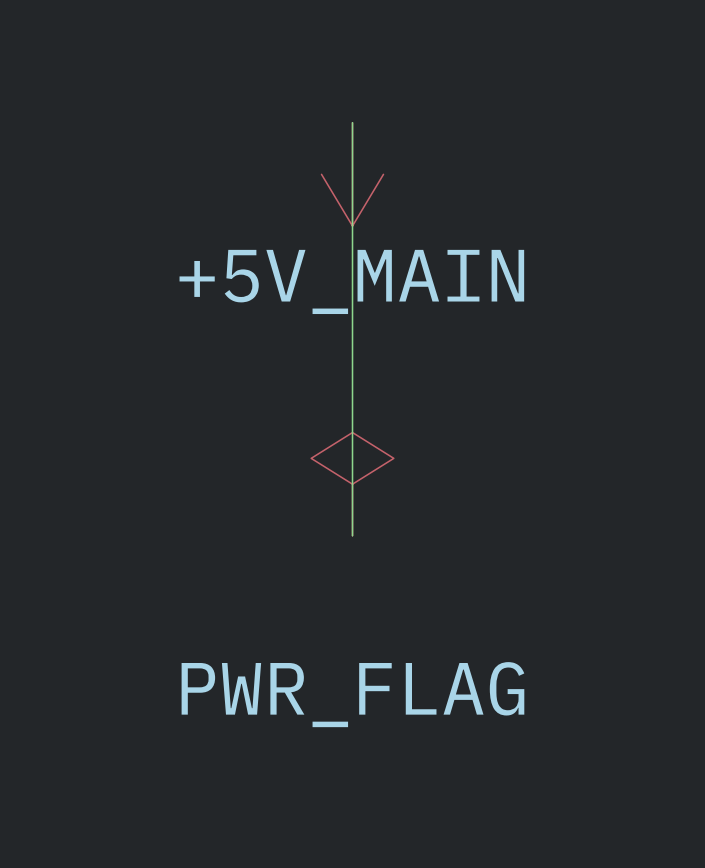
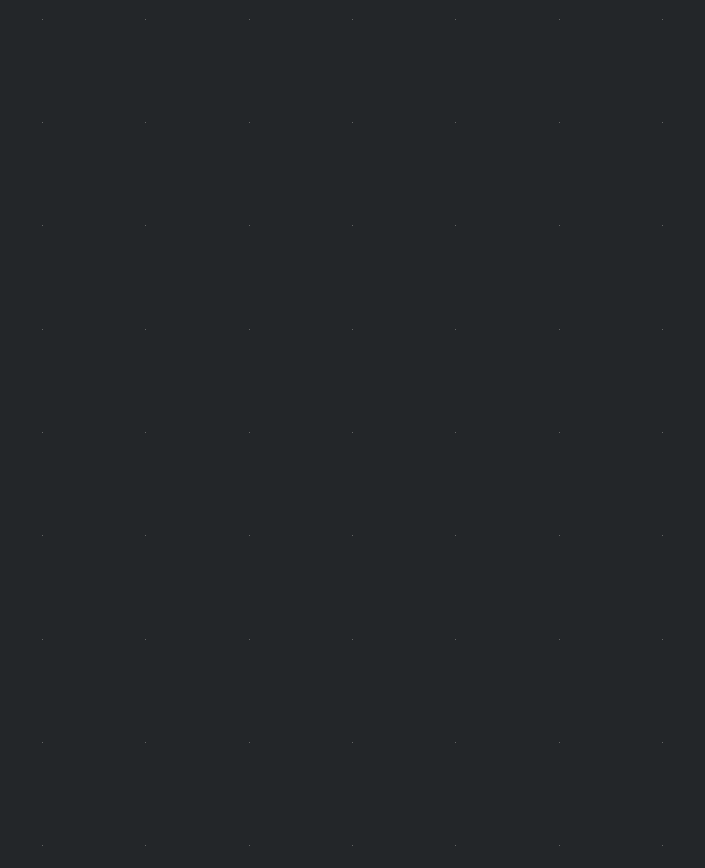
wire: (352, 122) (352, 535) -> none
power symbol: +5V_MAIN (352, 174) -> none
power symbol: PWR_FLAG (352, 484) -> none

